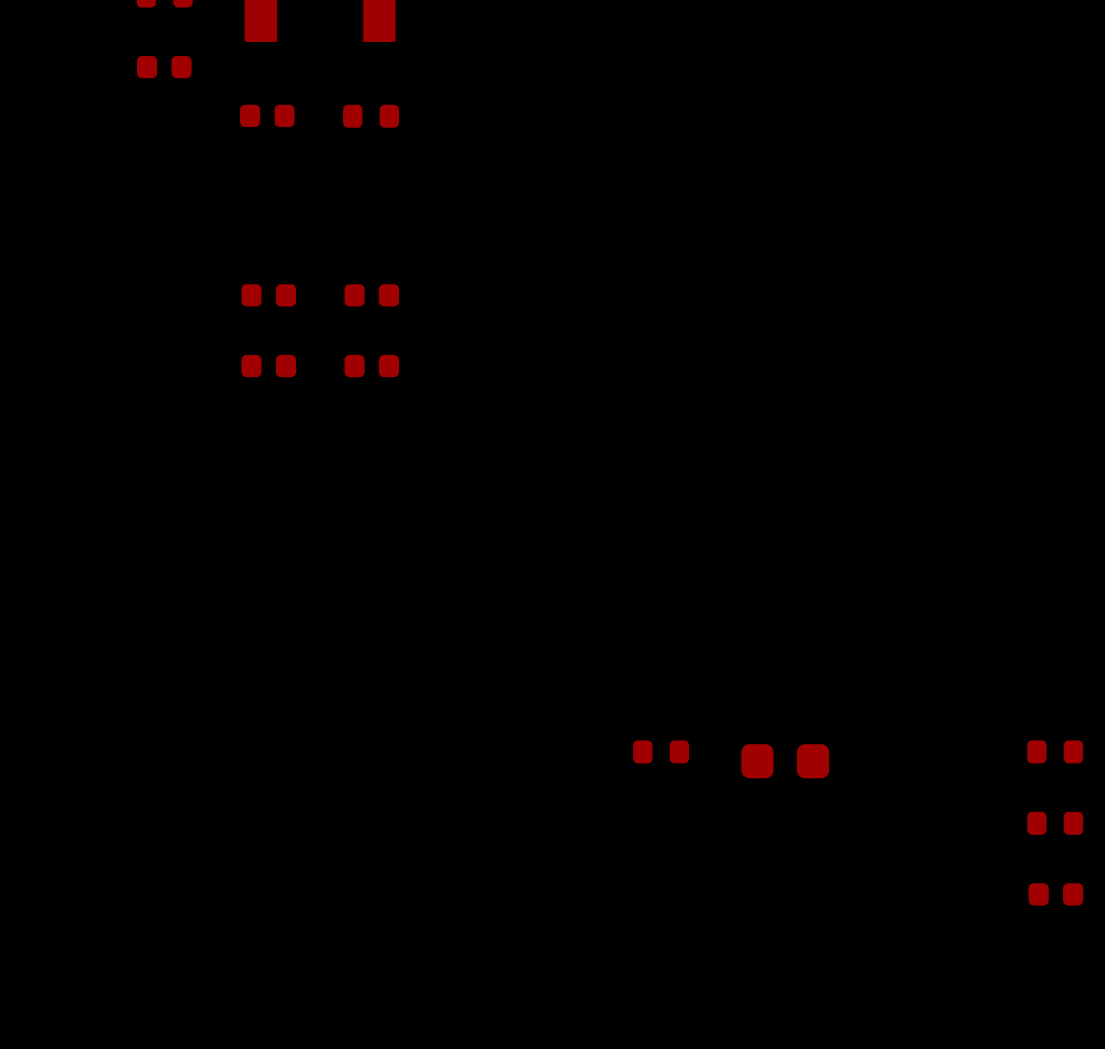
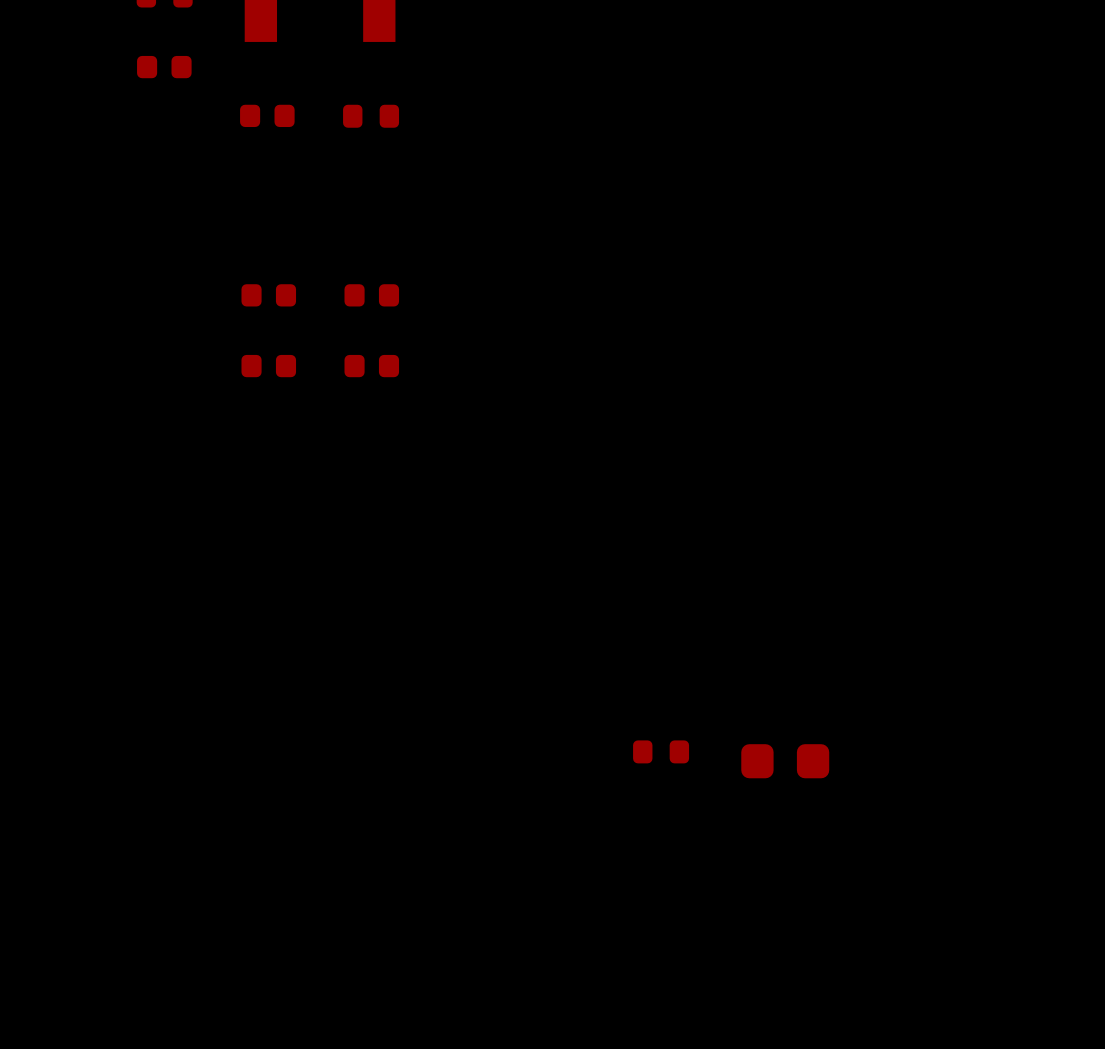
part: (1055, 751) -> none
part: (1055, 823) -> none
part: (1055, 894) -> none

